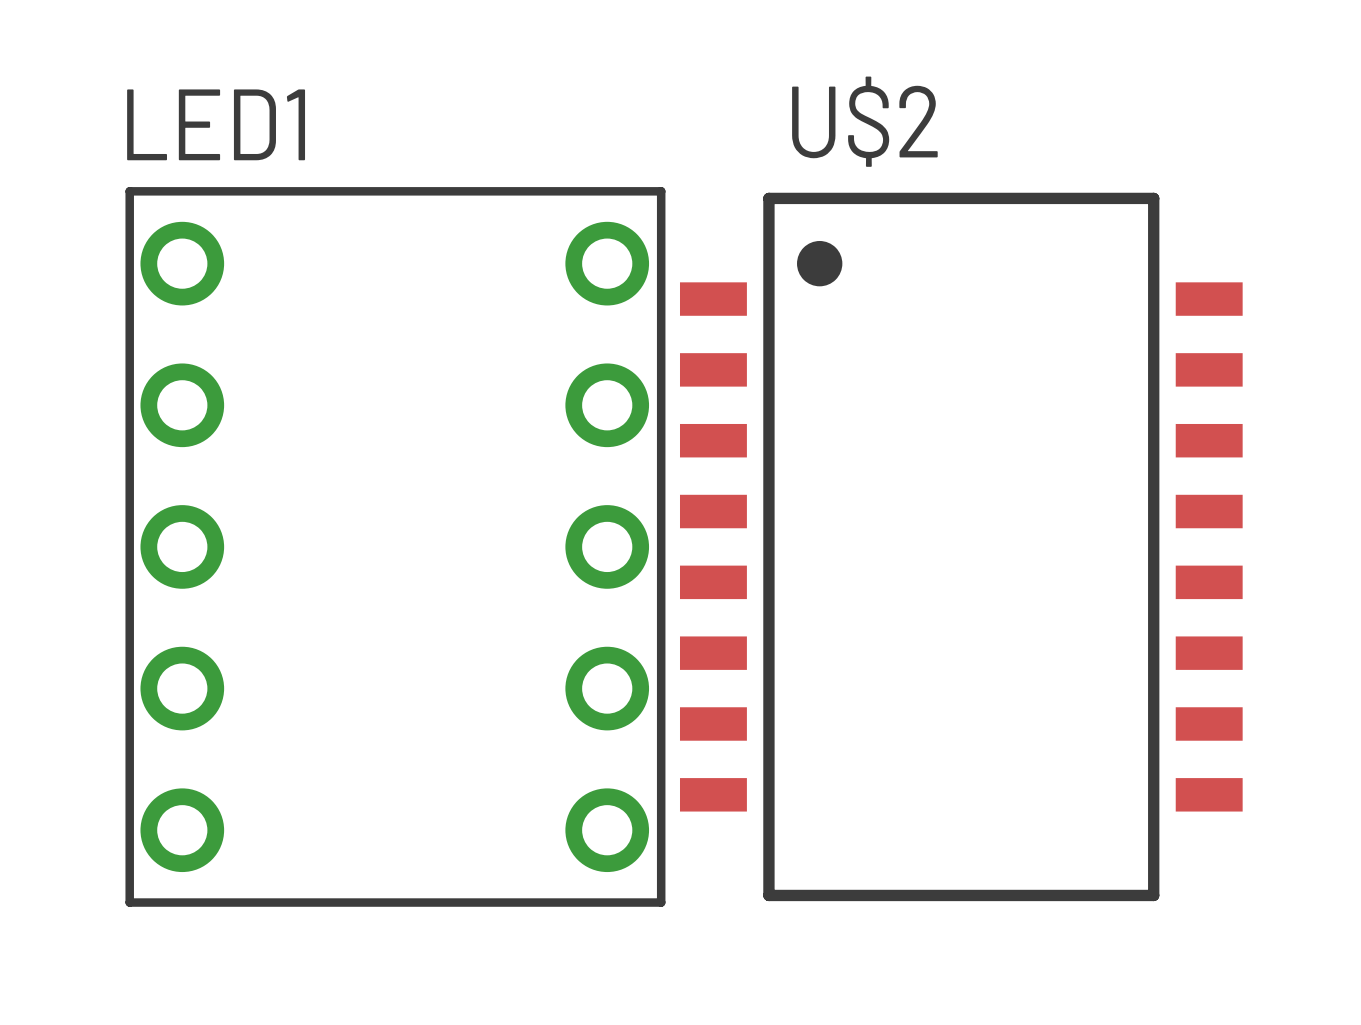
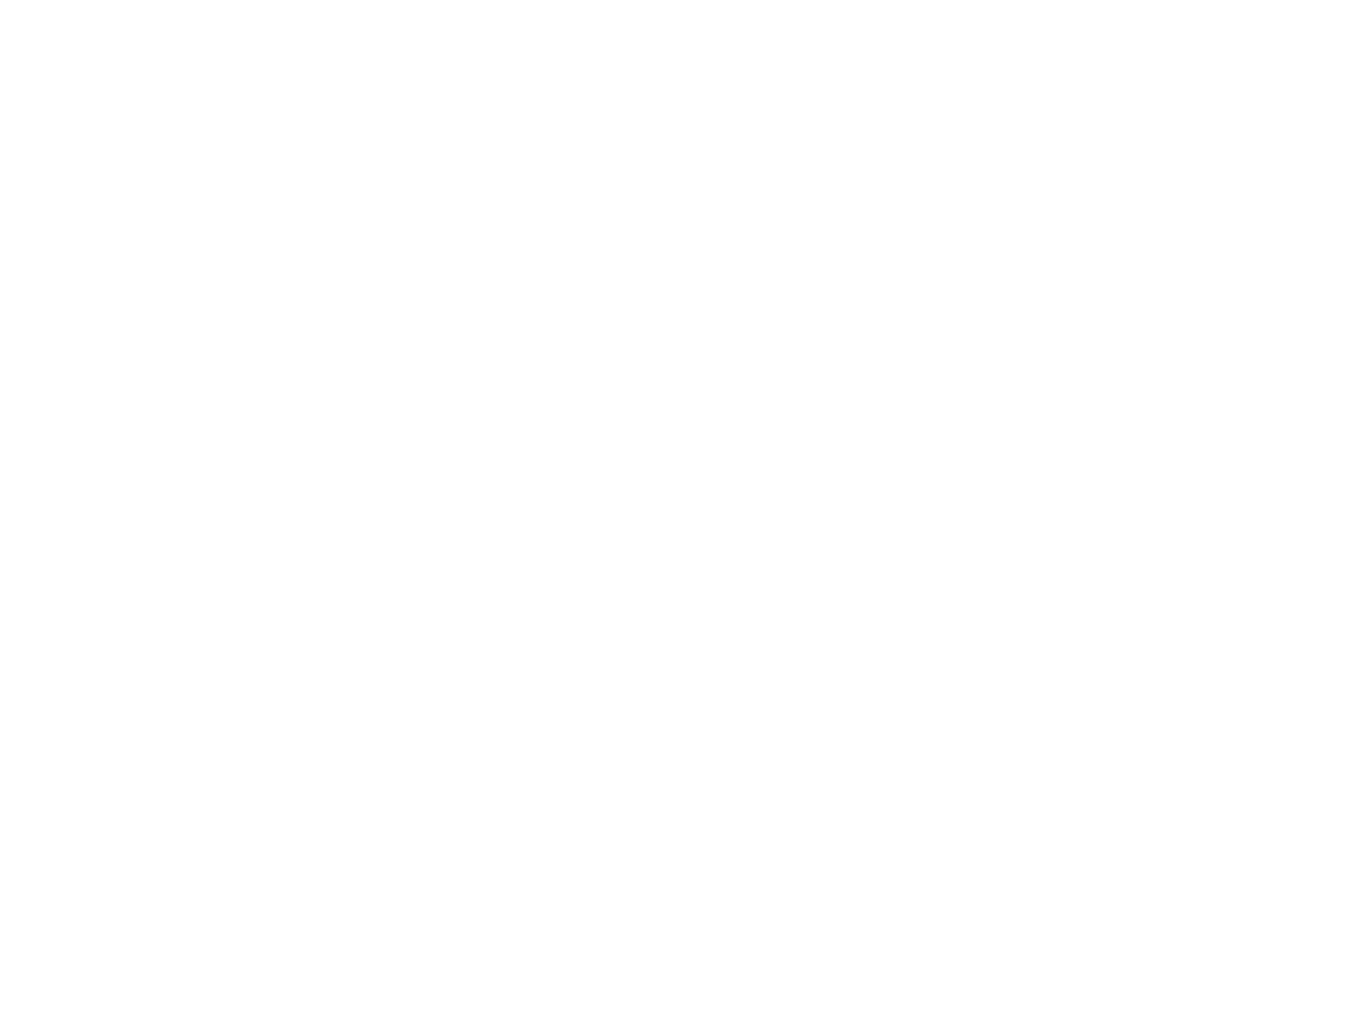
LED1: (395, 546) -> none
U$2: (961, 546) -> none

